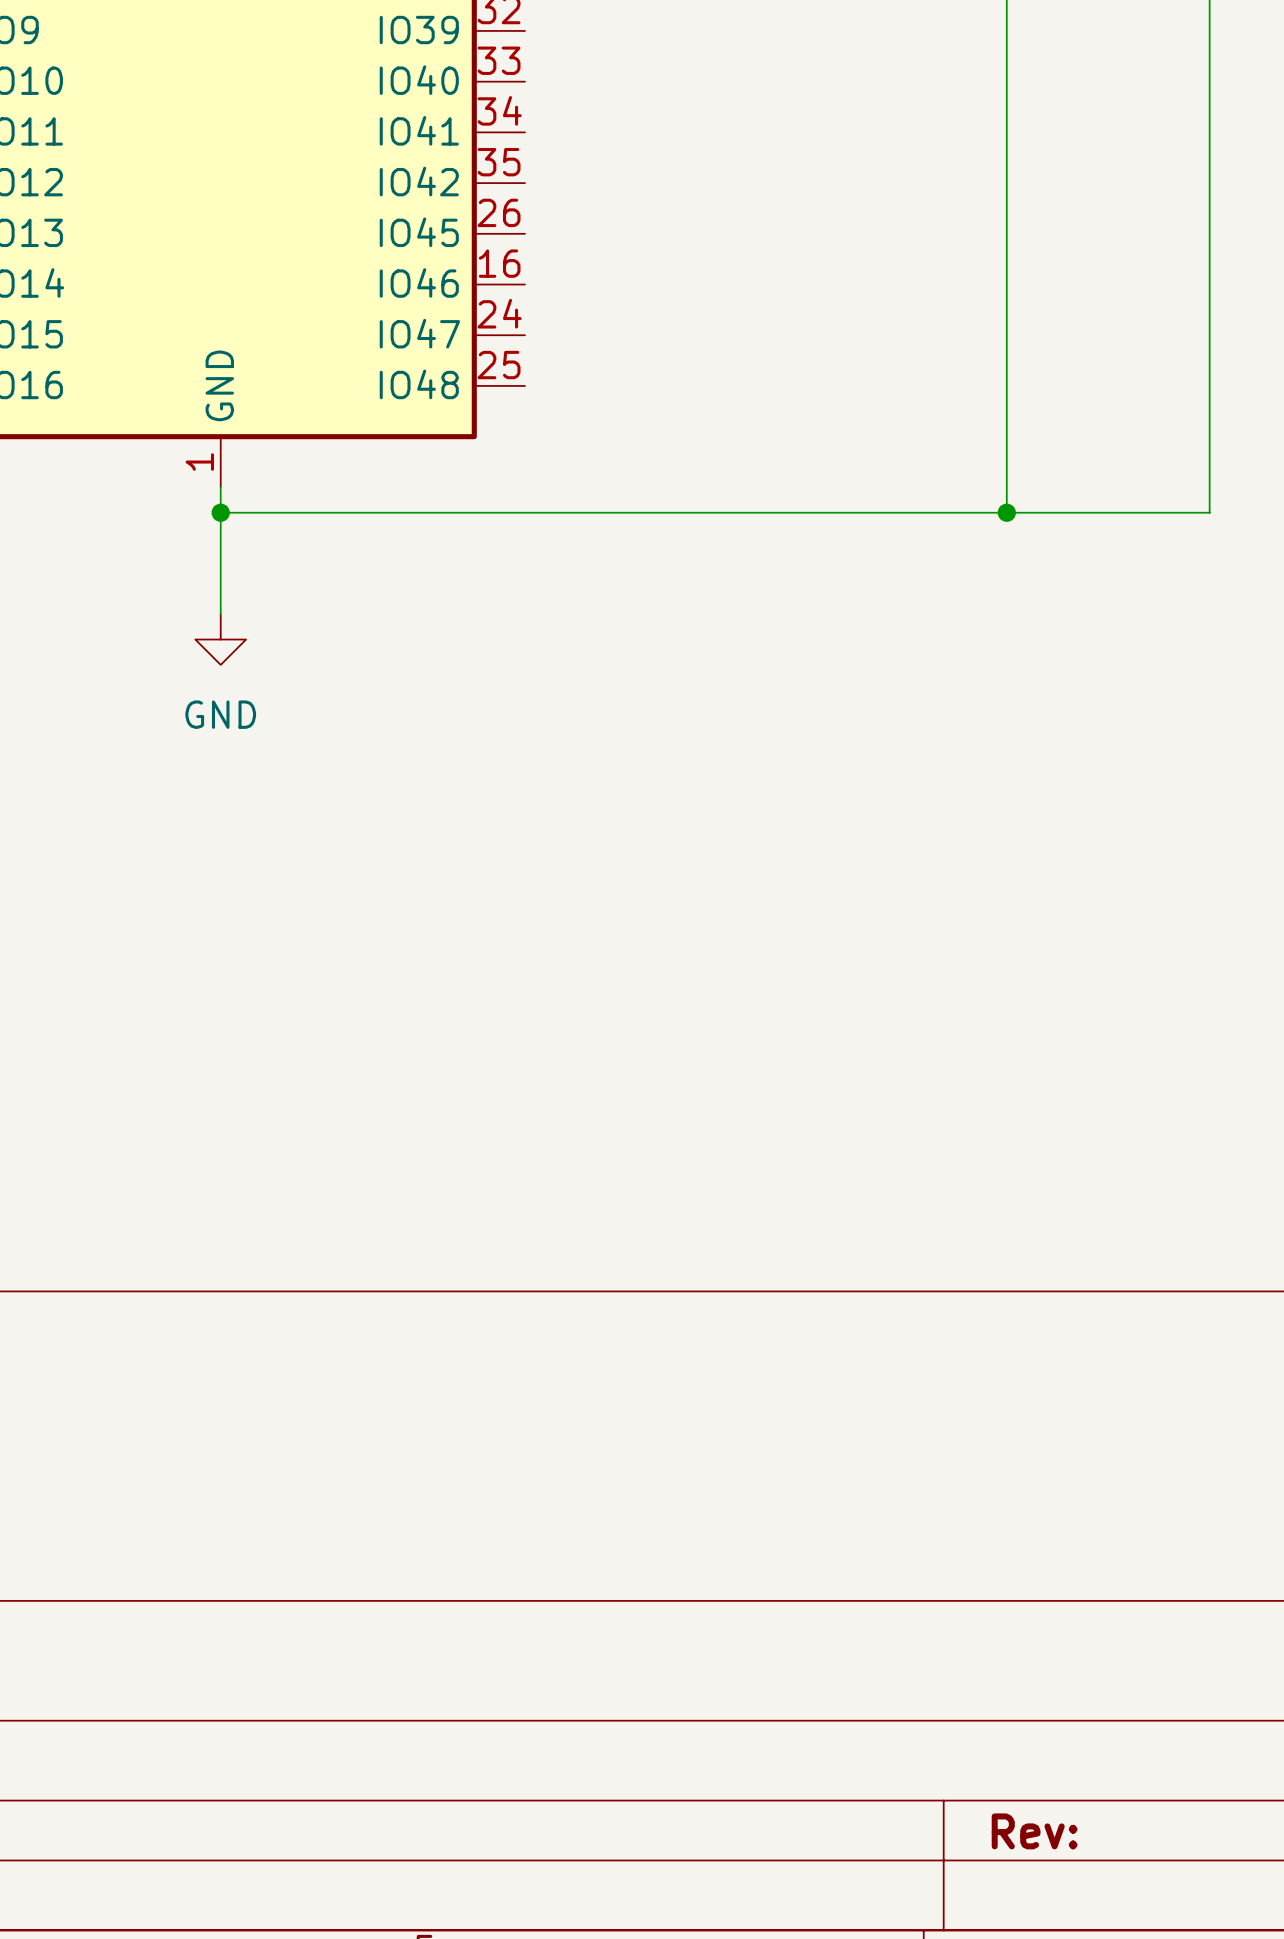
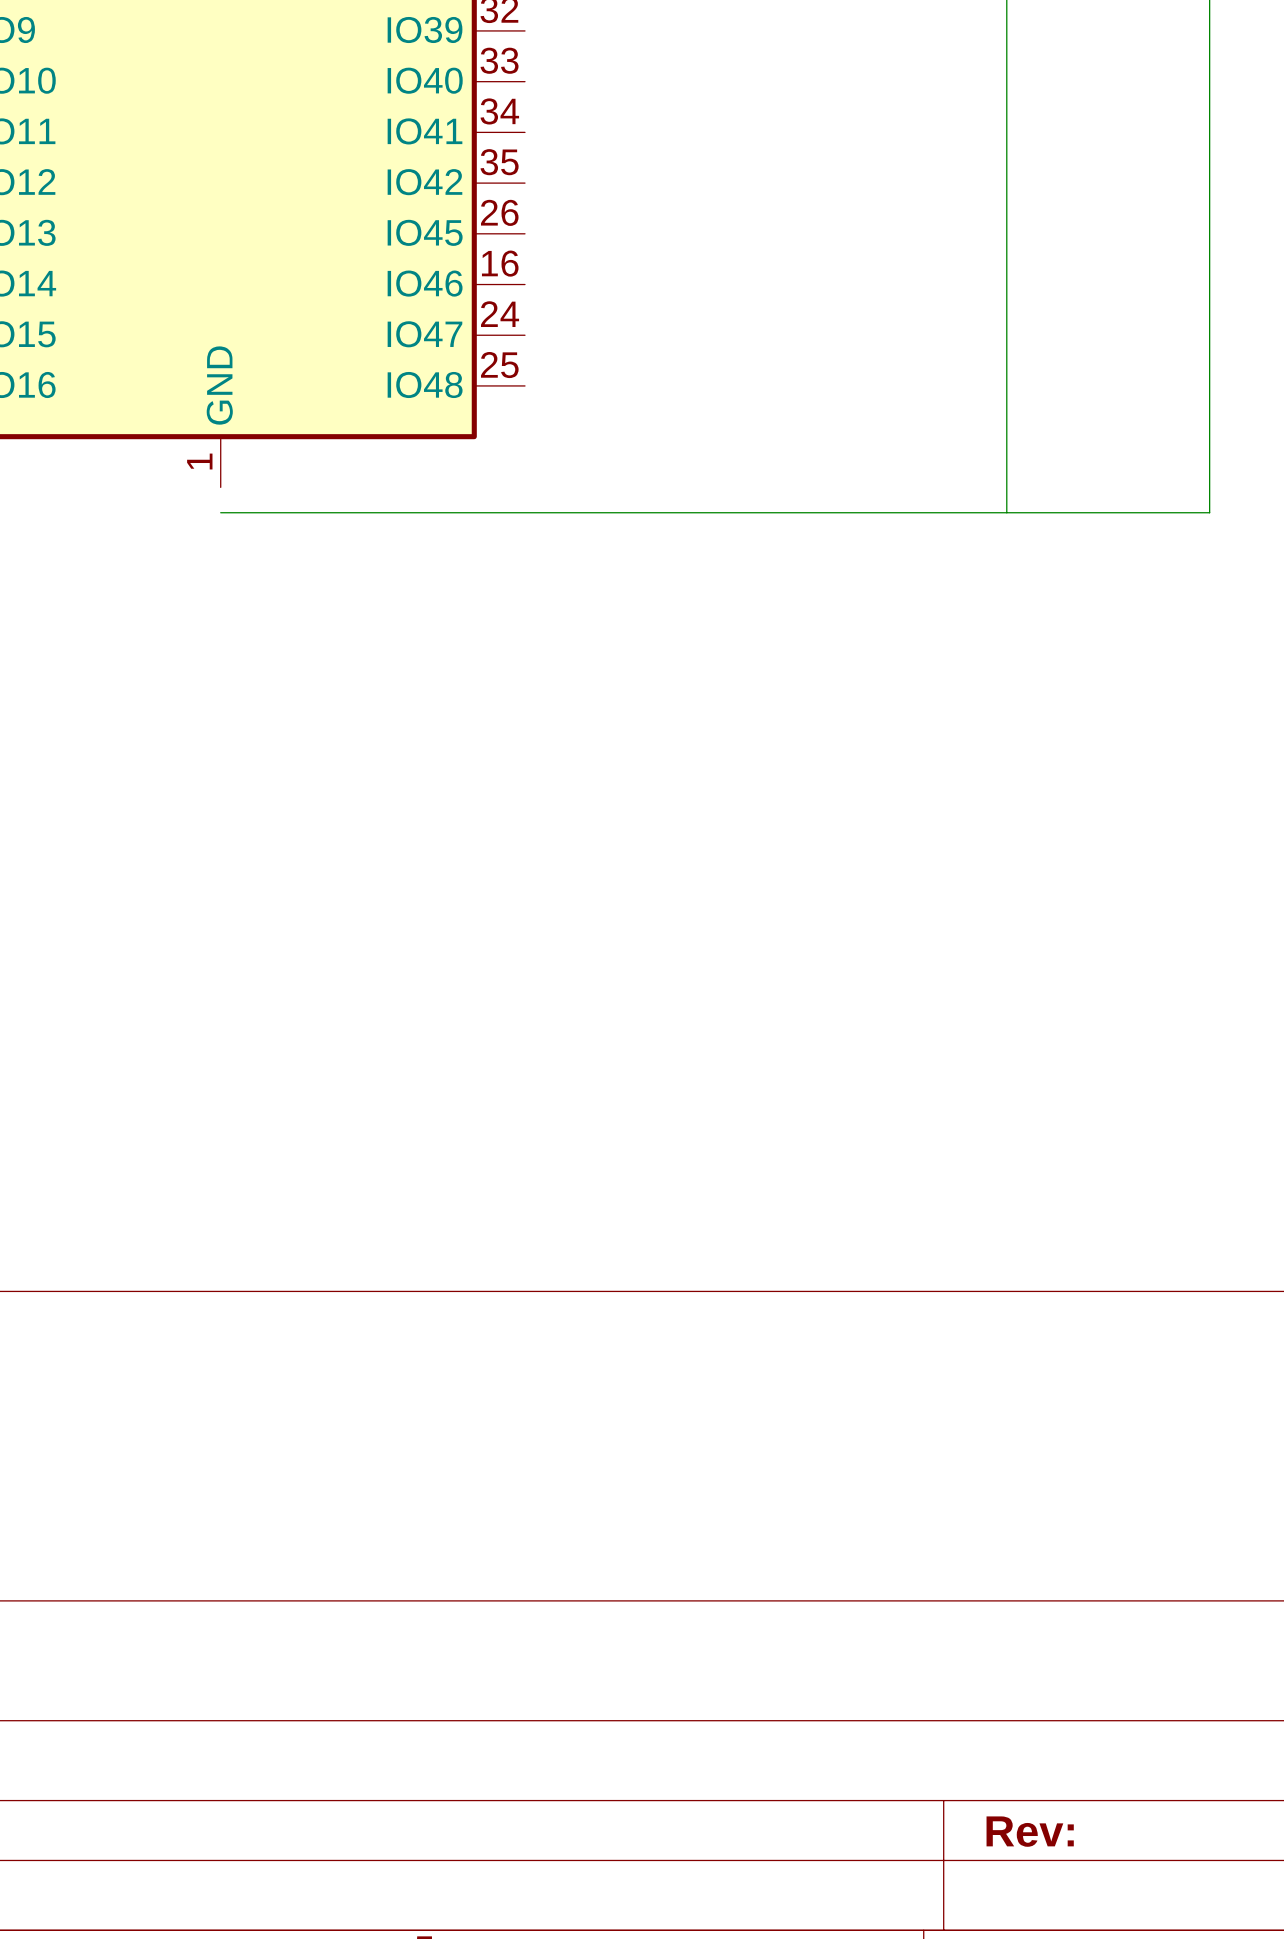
wire: (220, 487) (220, 614) -> none
junction: (220, 512) -> none
junction: (1006, 512) -> none
power symbol: GND (220, 639) -> none

